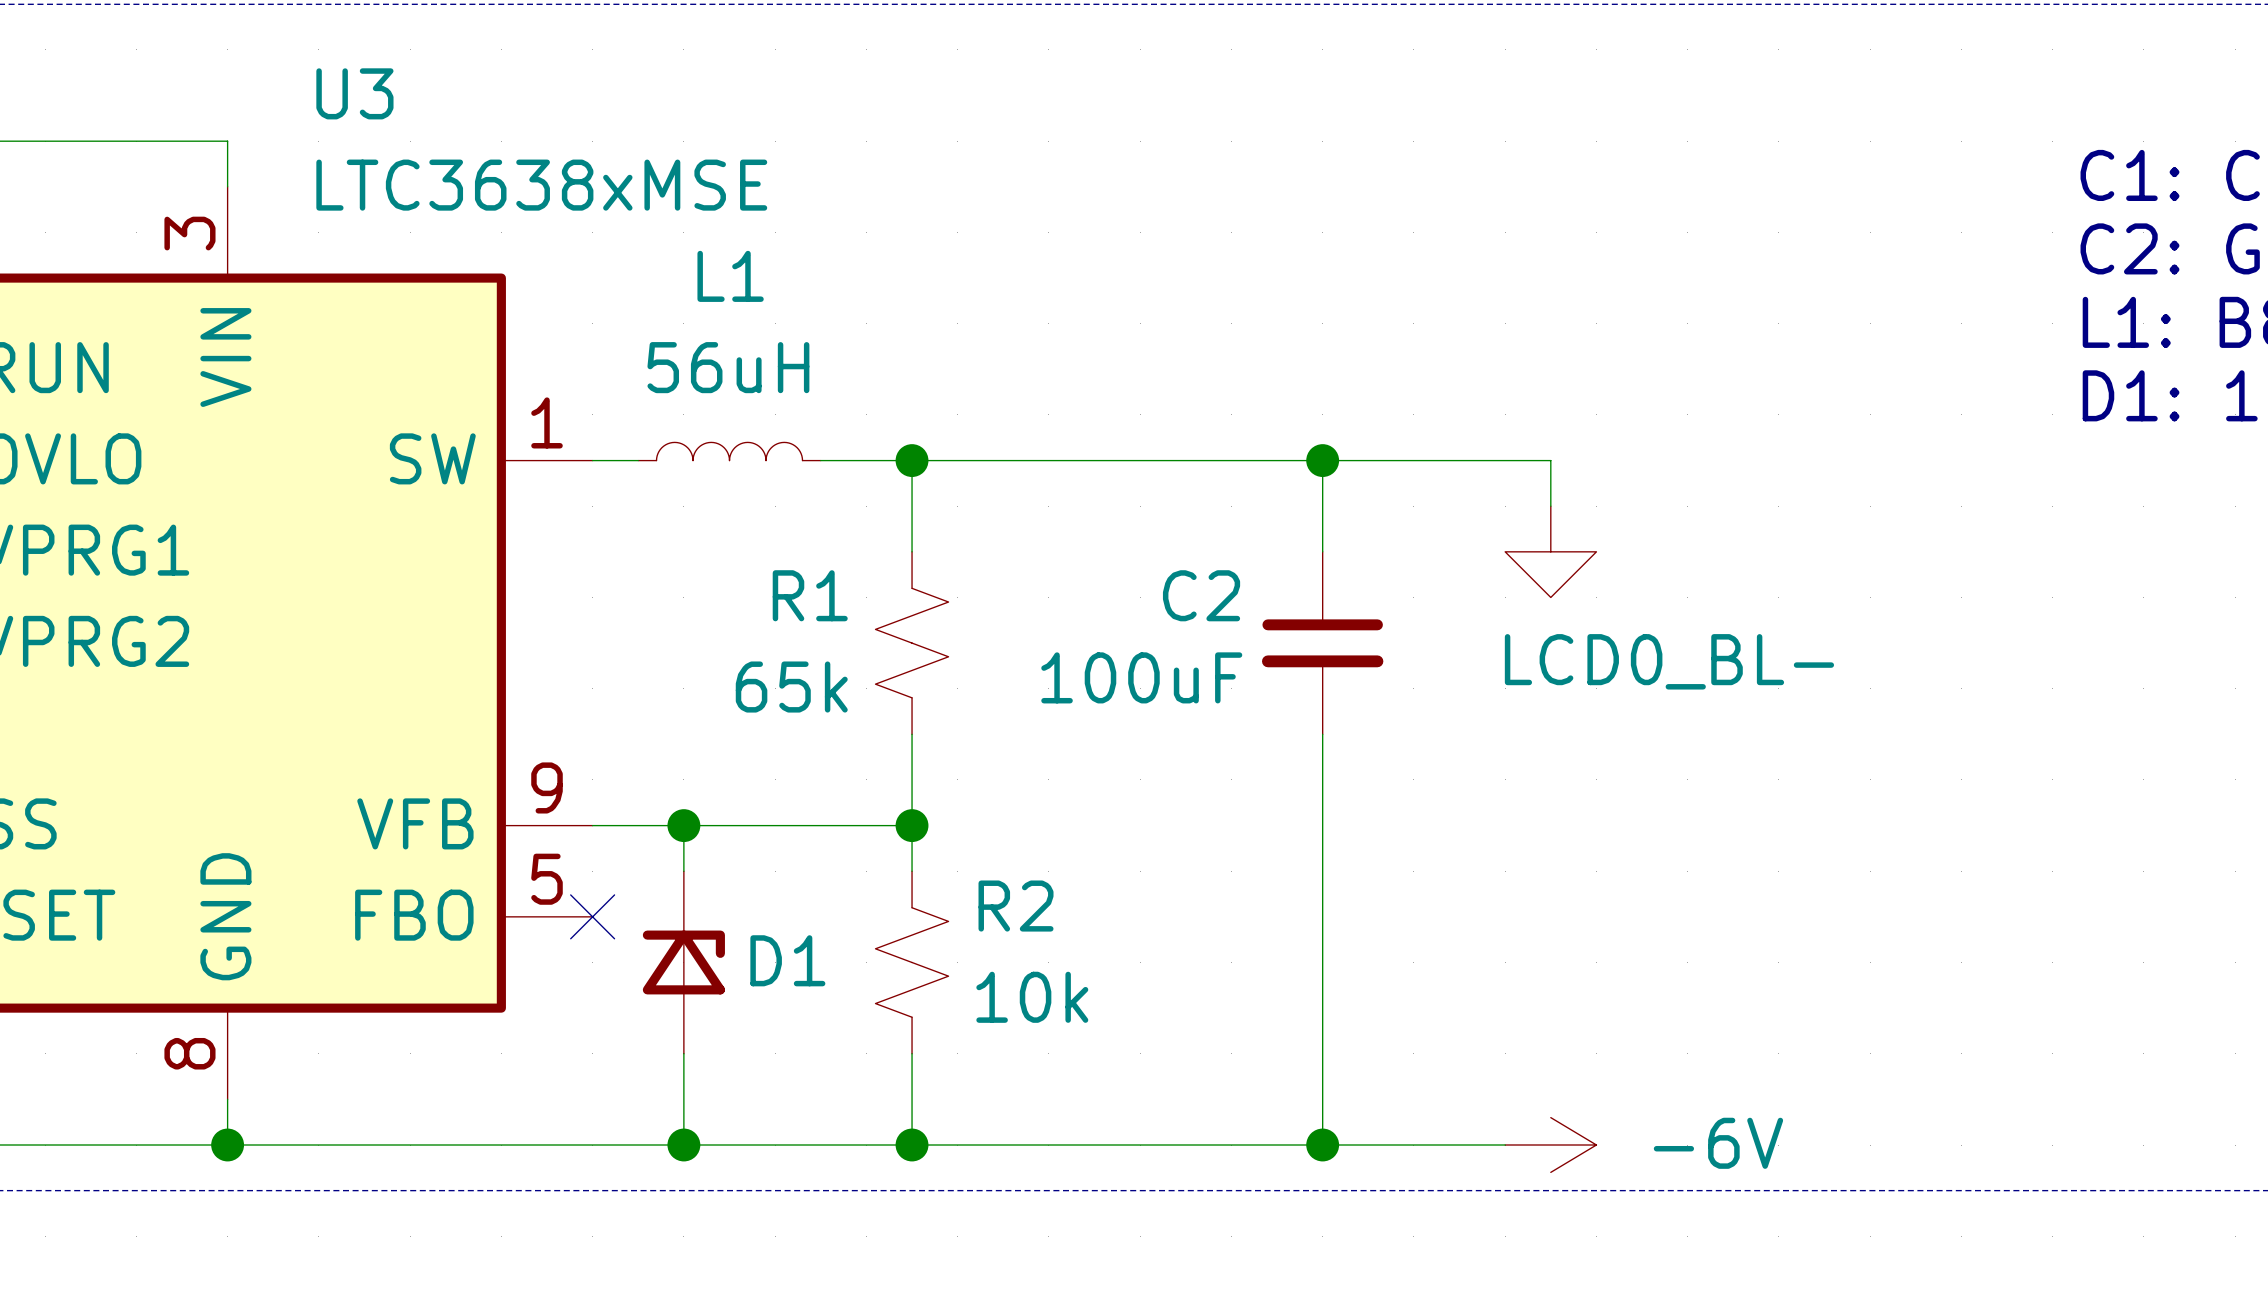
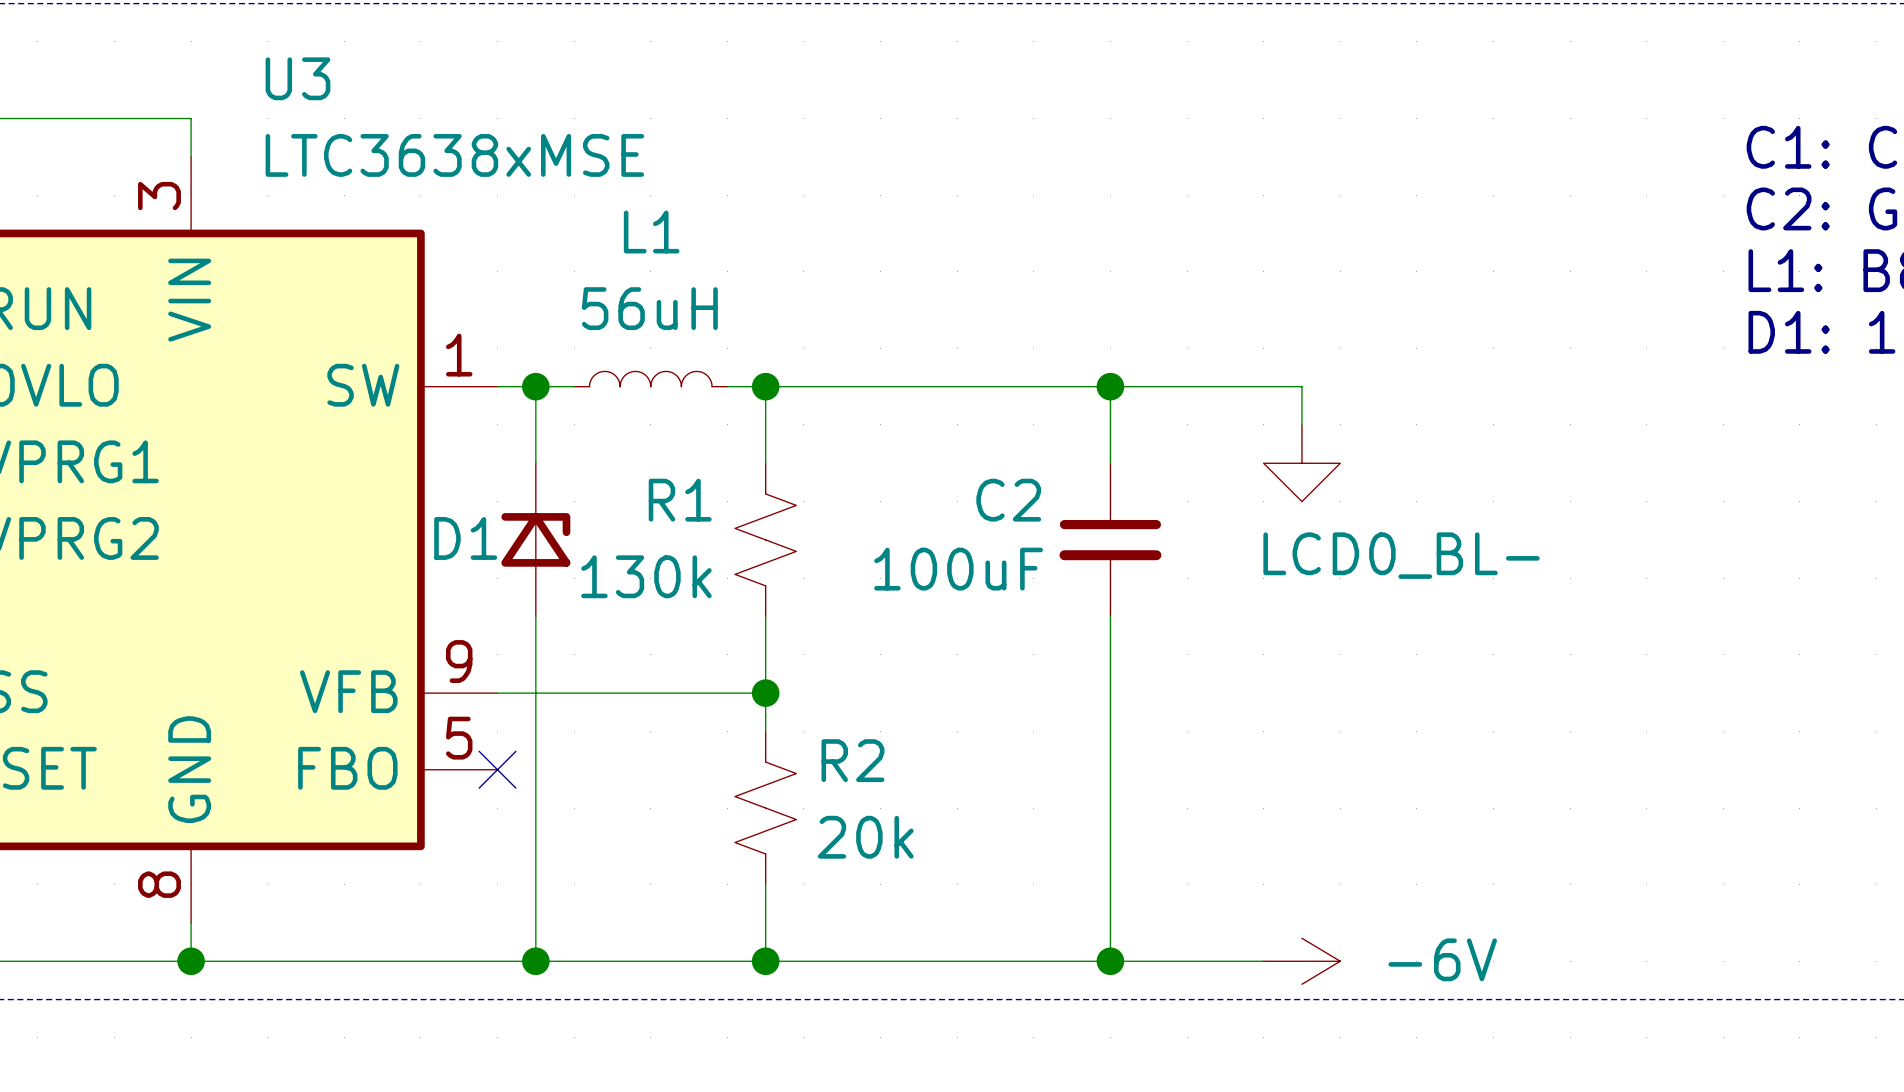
L1 position: (729, 451) -> (650, 379)
junction: none -> (535, 386)
wire: none -> (574, 386) (535, 386) (535, 463)
wire: (820, 460) (866, 460) -> none
R1 value: 65k (791, 687) -> 130k (646, 576)
wire: none -> (535, 616) (535, 961)
wire: (683, 825) (683, 871) -> none
junction: (683, 825) -> none
D1 name position: D1 (787, 960) -> D1 (465, 538)
D1 position: (683, 962) -> (535, 539)
R2 value: 10k (1032, 997) -> 20k (865, 837)
wire: (683, 1053) (683, 1145) -> none
junction position: (683, 1145) -> (535, 961)

